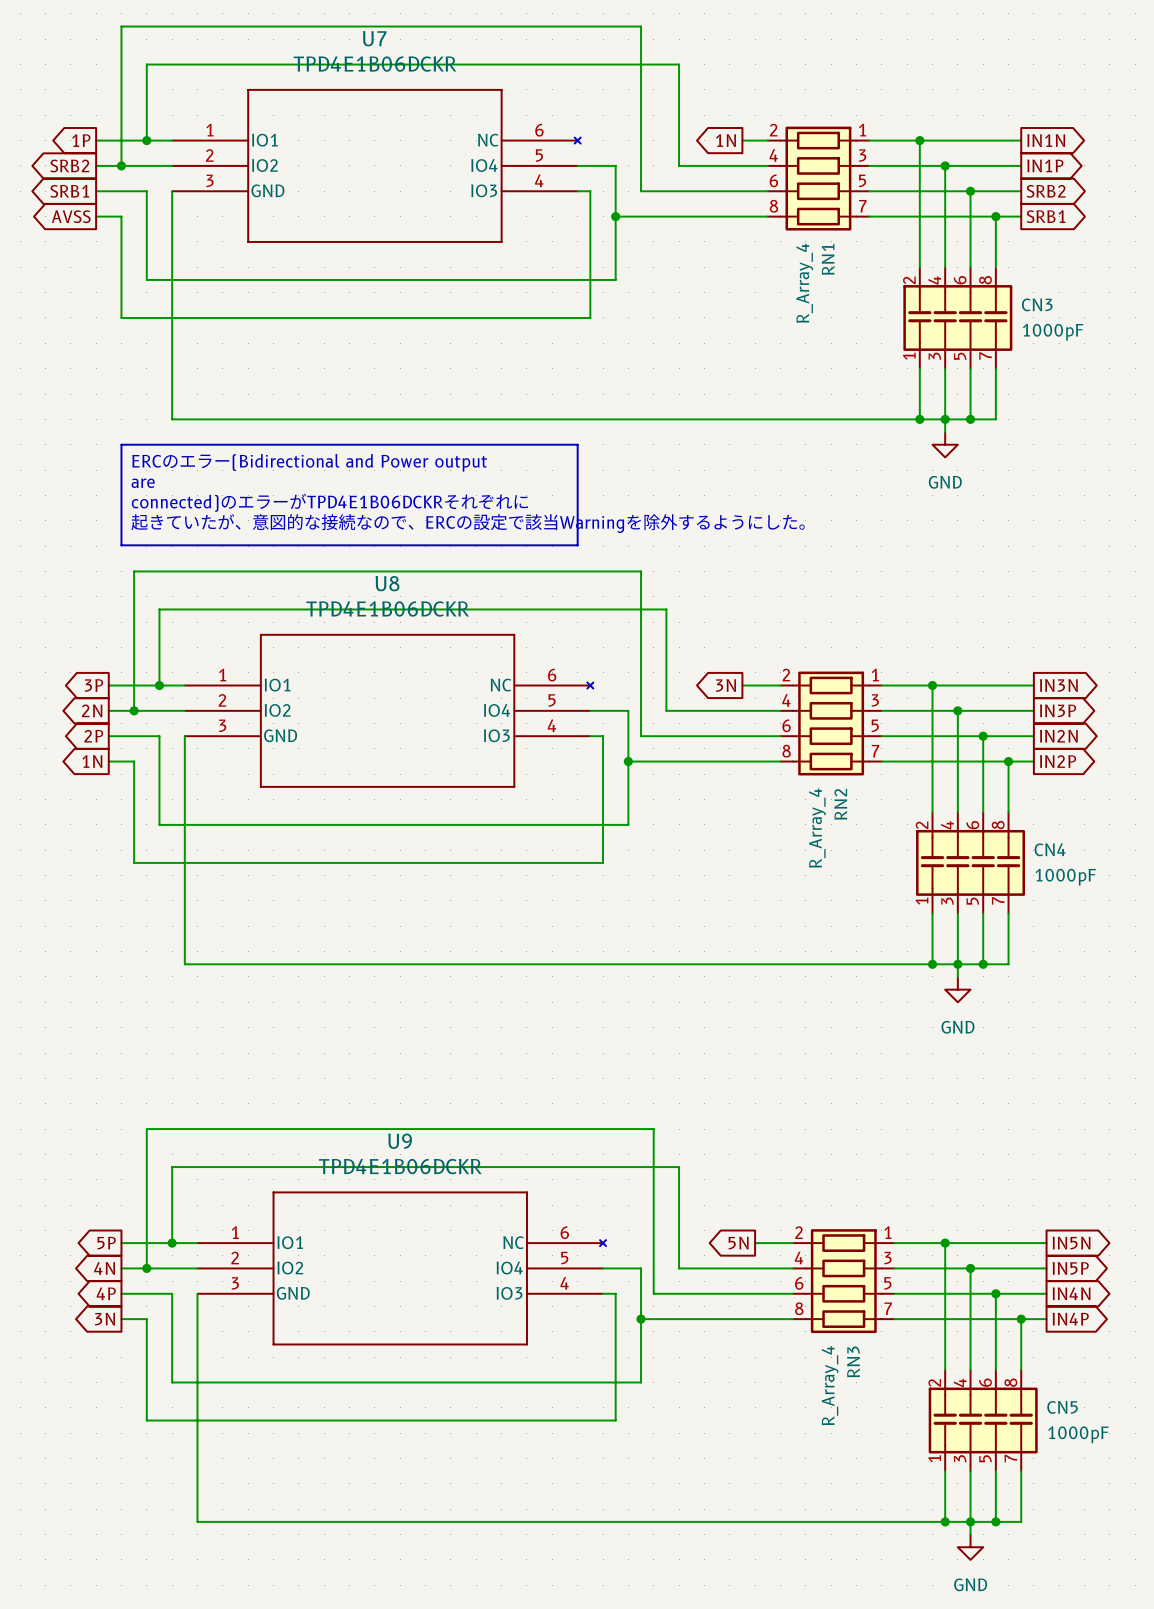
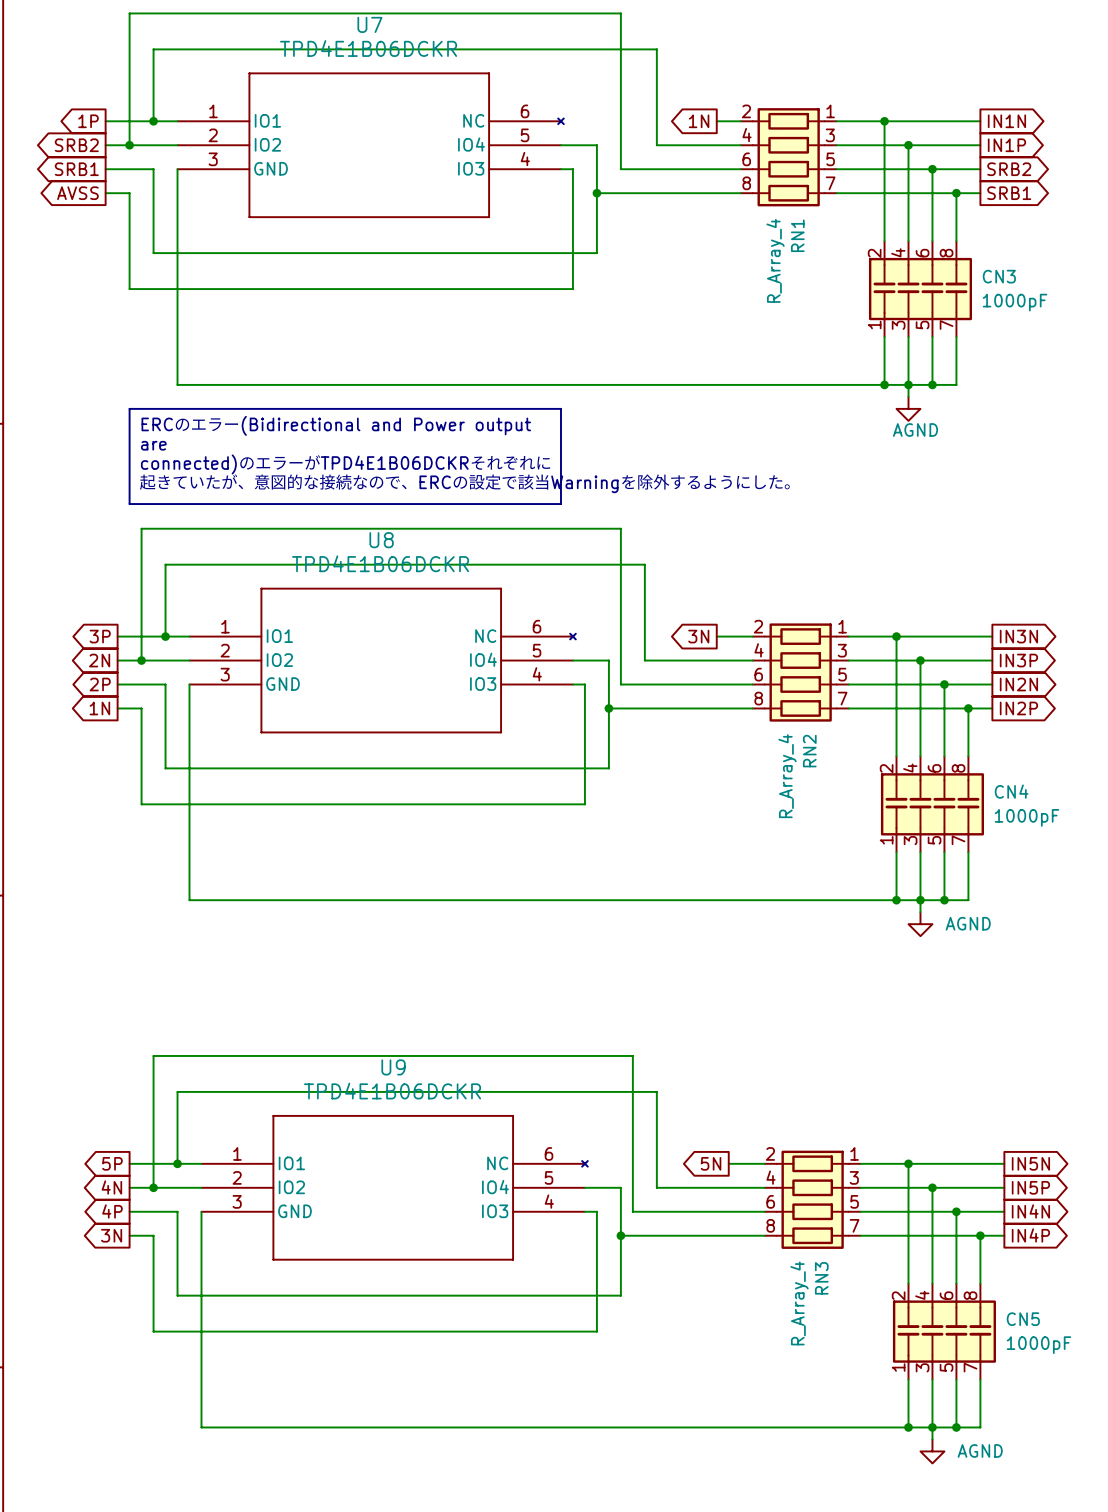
power symbol: GND (945, 444) -> AGND (908, 408)
power symbol: GND (957, 989) -> AGND (920, 924)
power symbol: GND (970, 1547) -> AGND (932, 1451)

